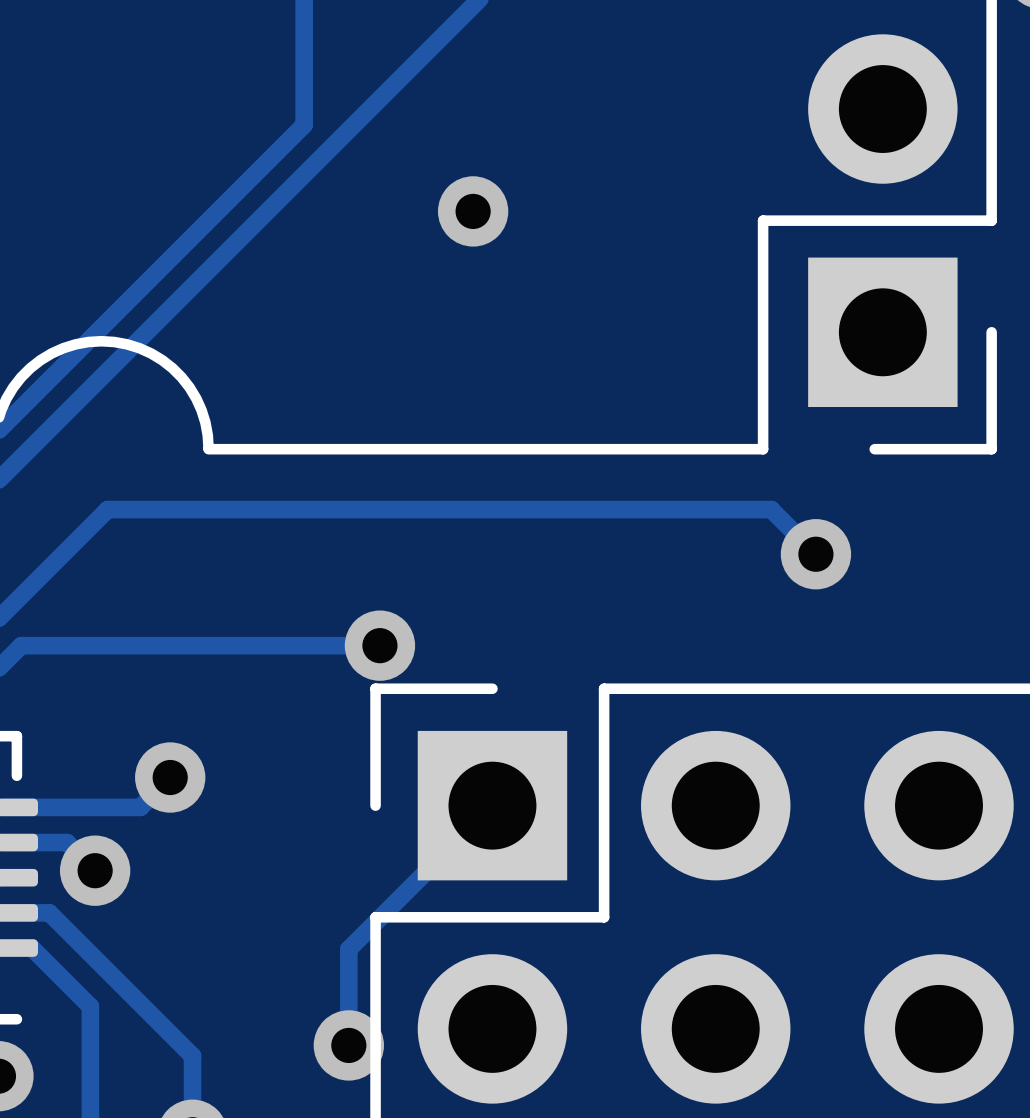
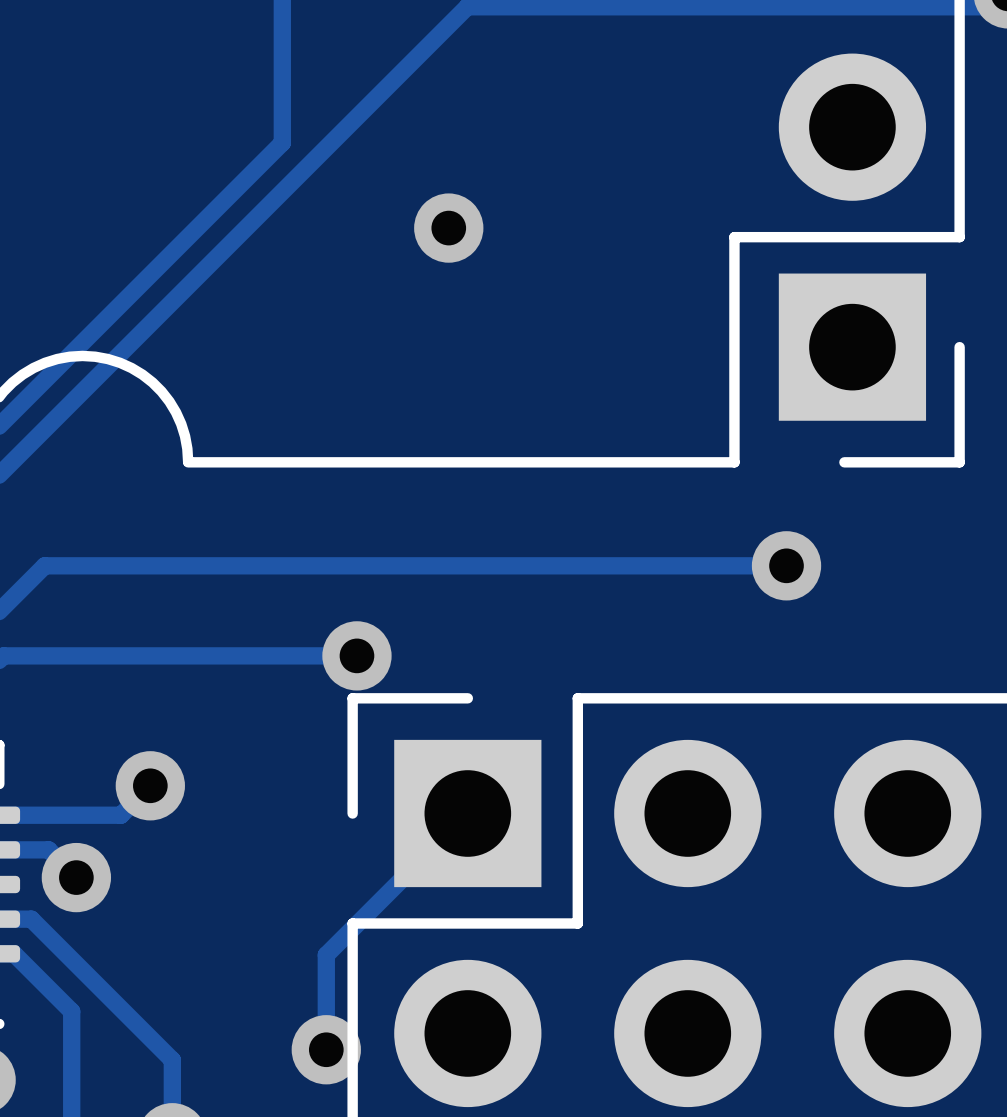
track: (63, 554) (107, 509) (771, 509) (815, 554) -> (44, 565) (786, 565)

